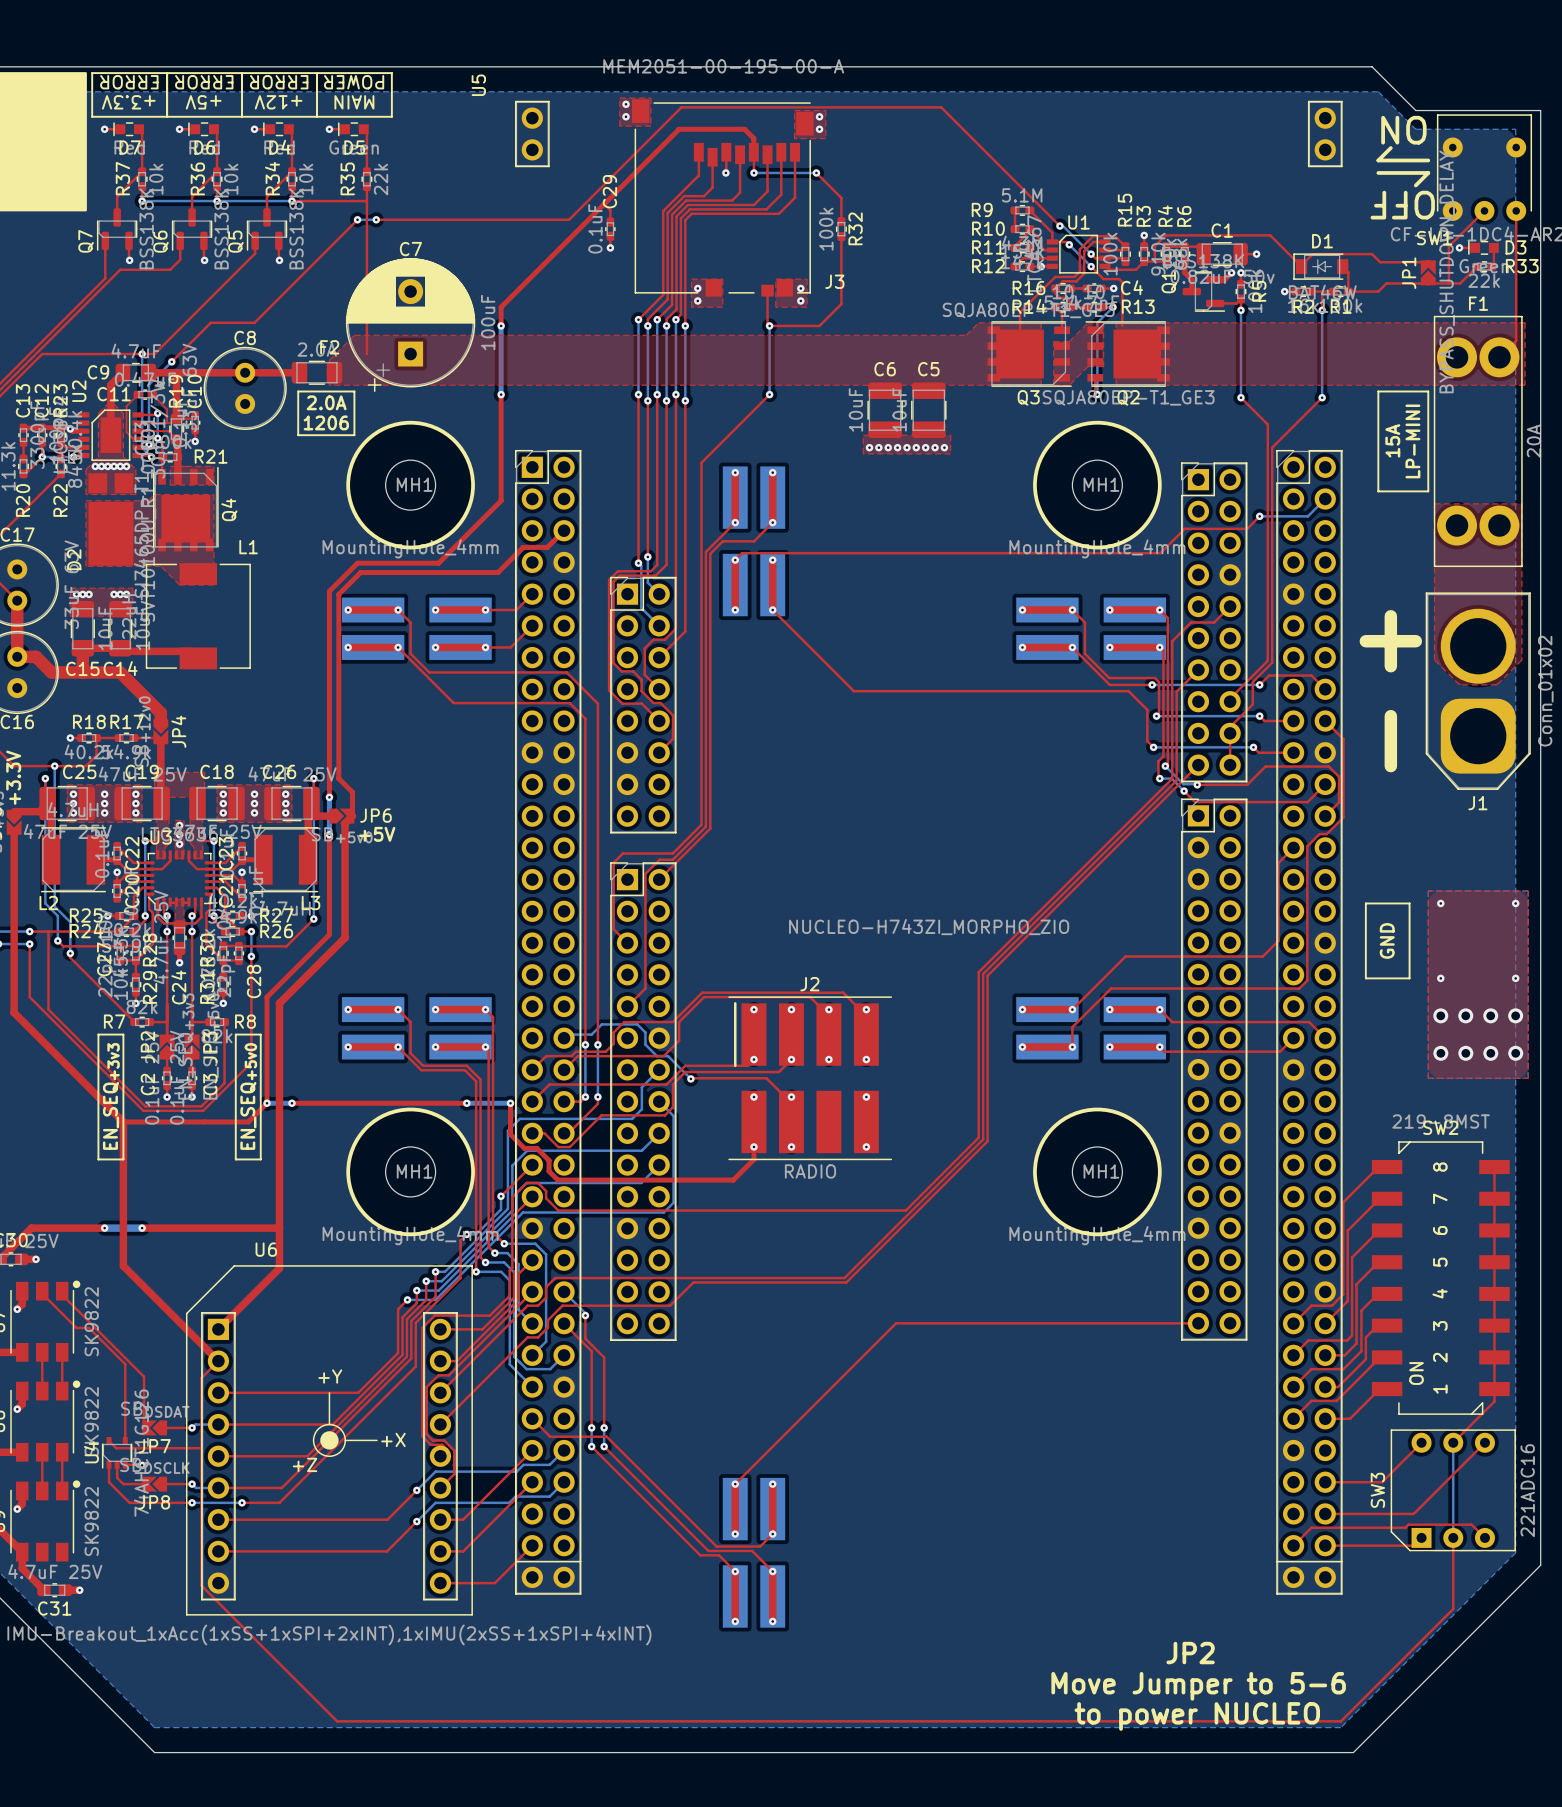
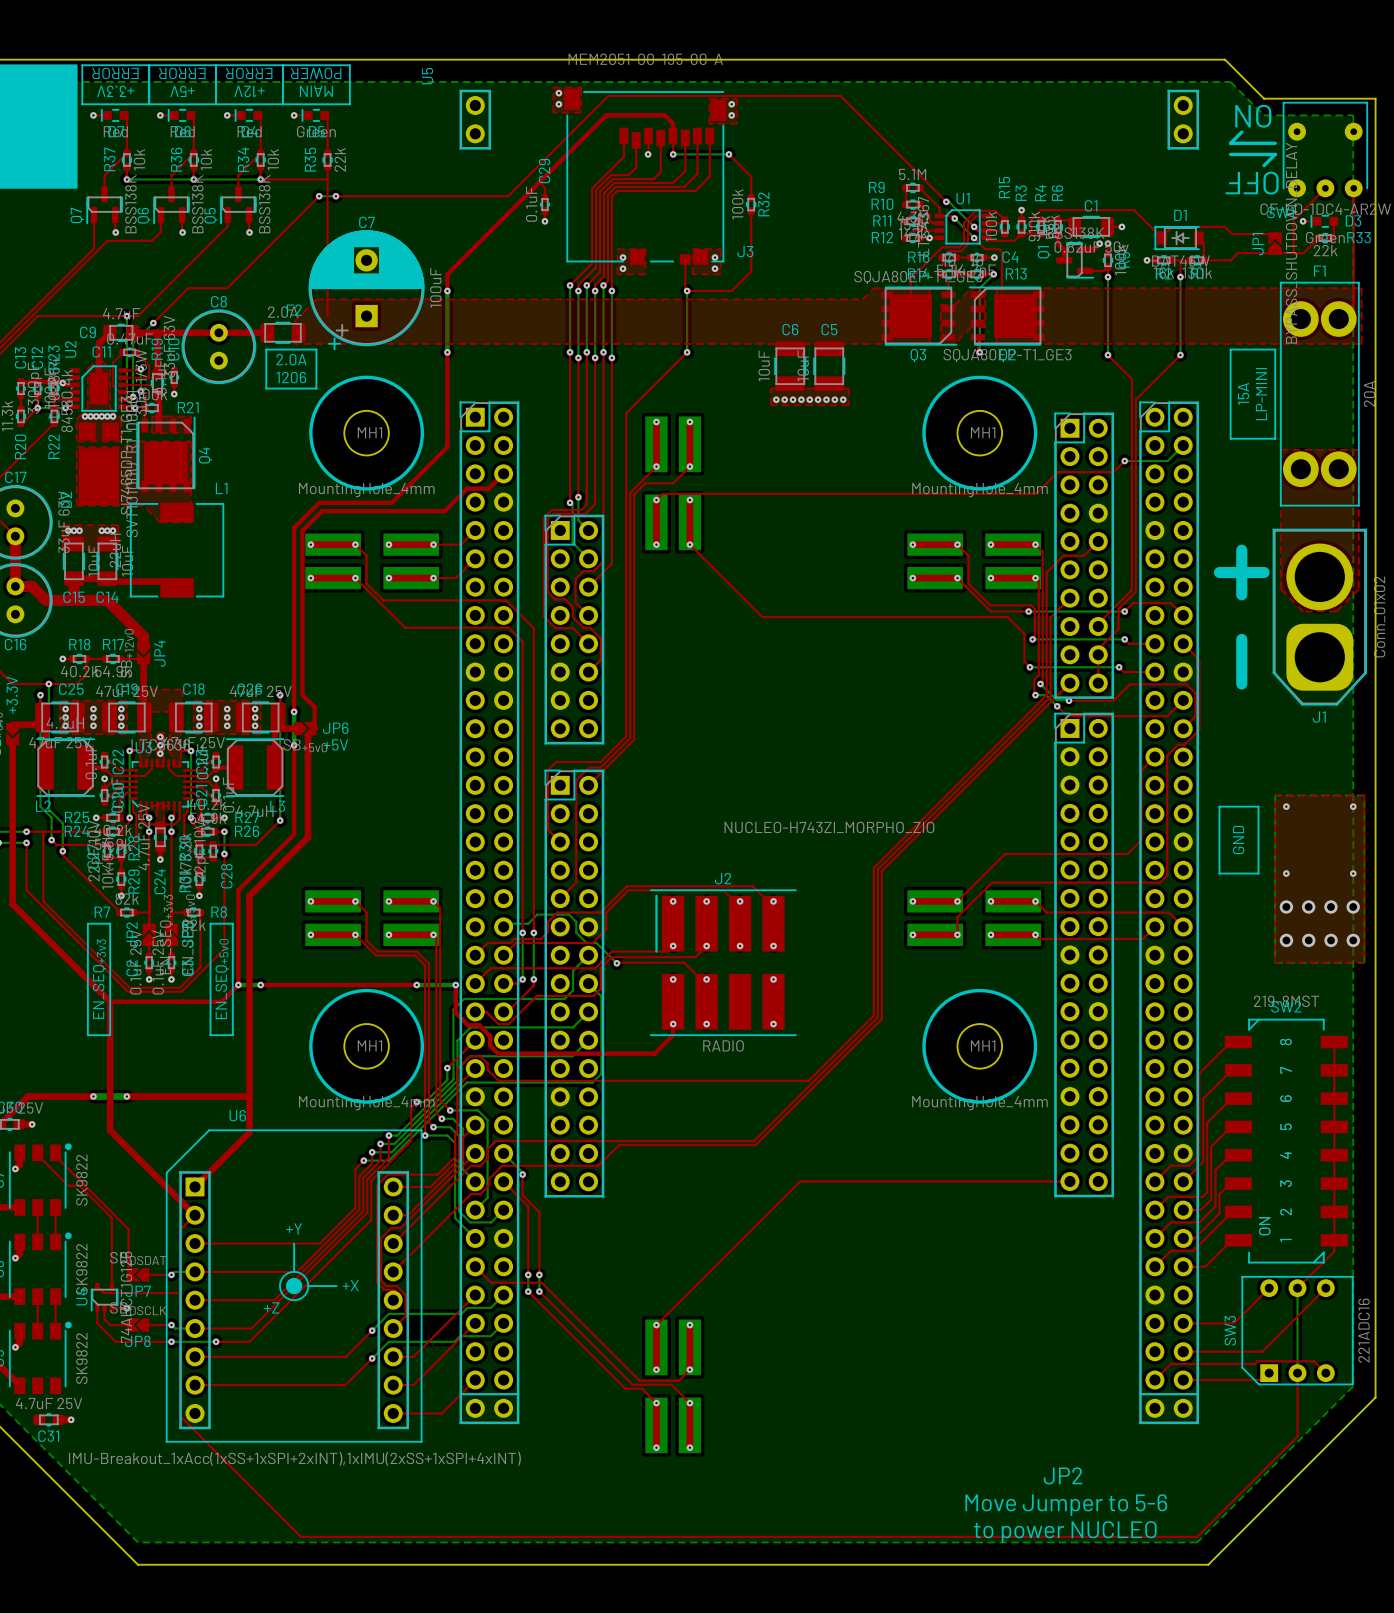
top track: (22, 1552) (22, 1568) (43, 1590) -> none

